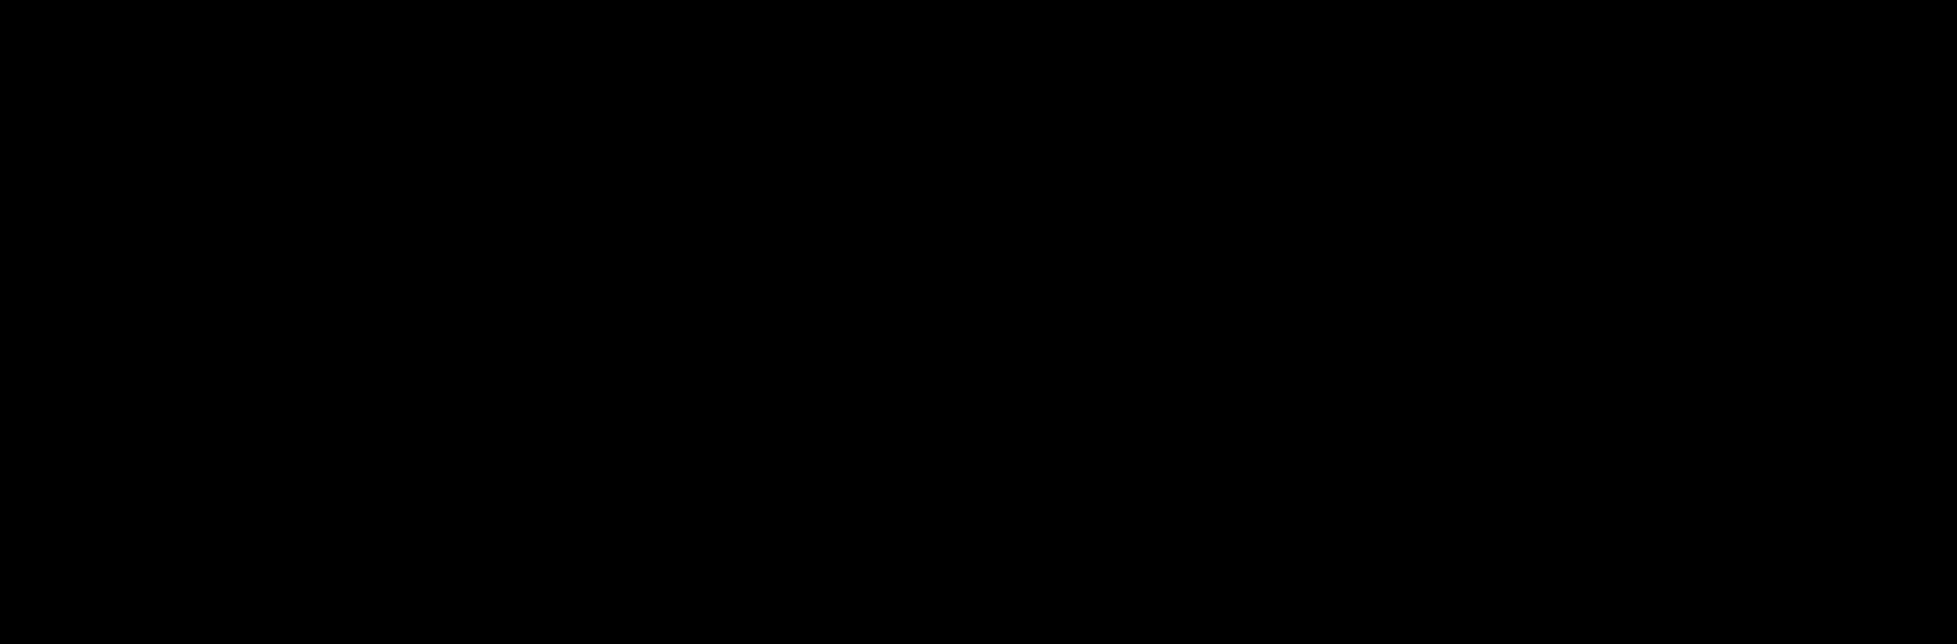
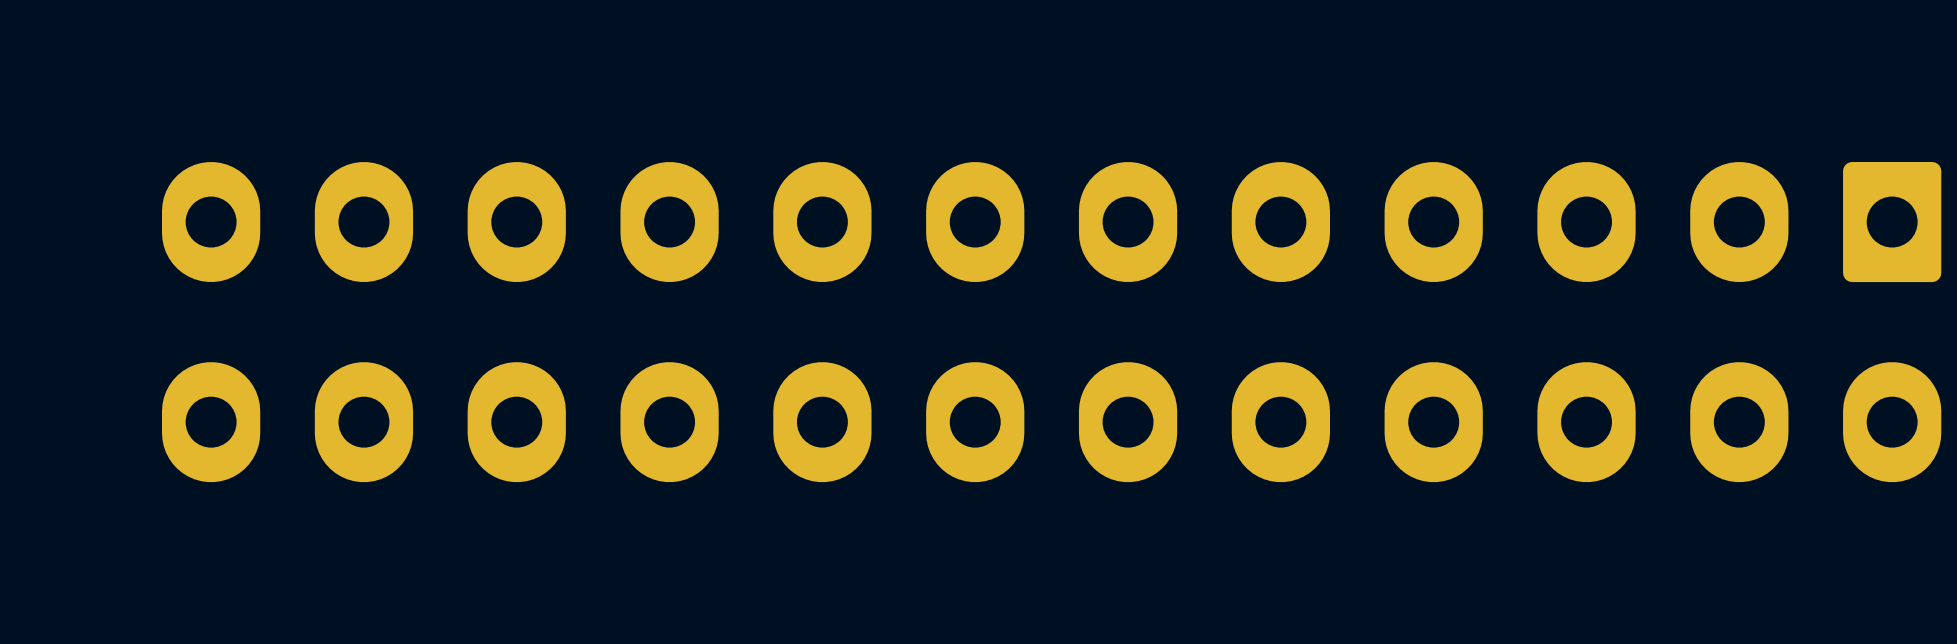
part: none -> (1051, 322)

